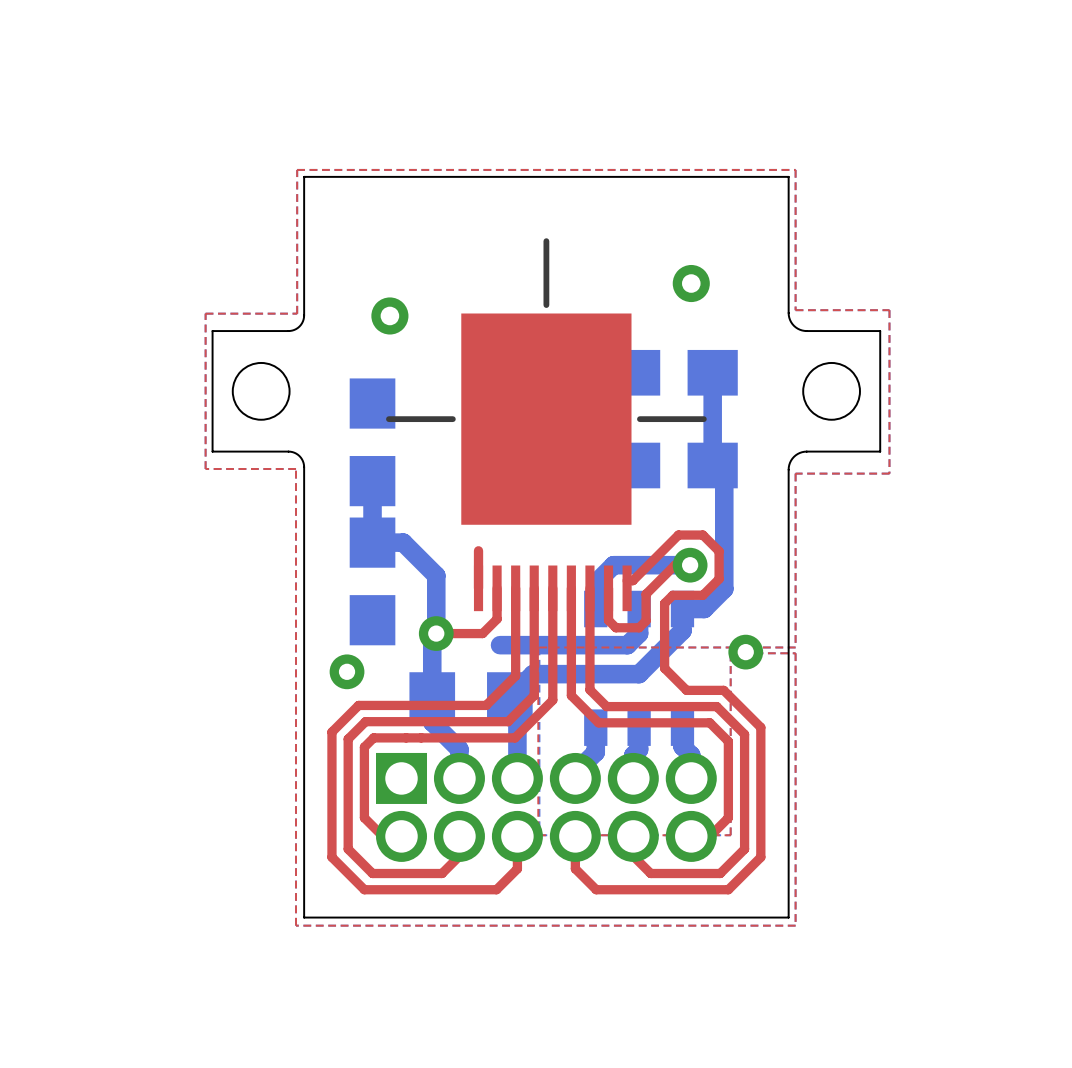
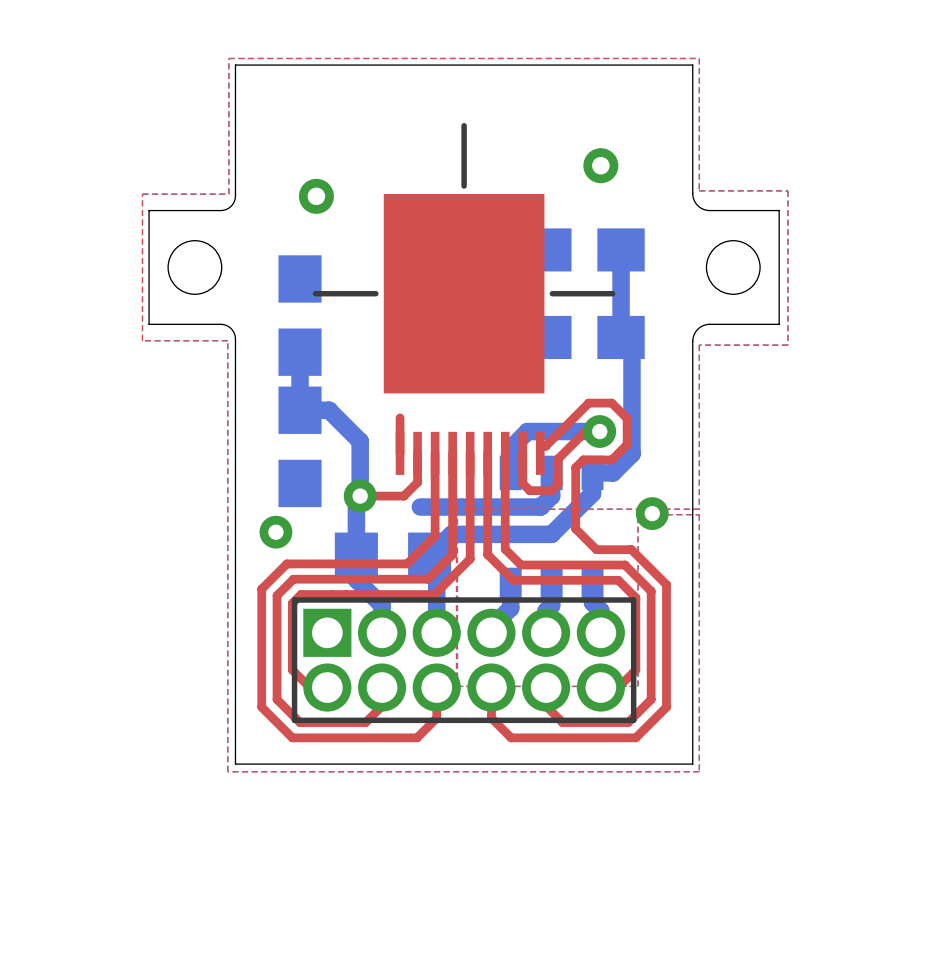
part footprint: [376, 752, 717, 862] -> [291, 597, 637, 724]

